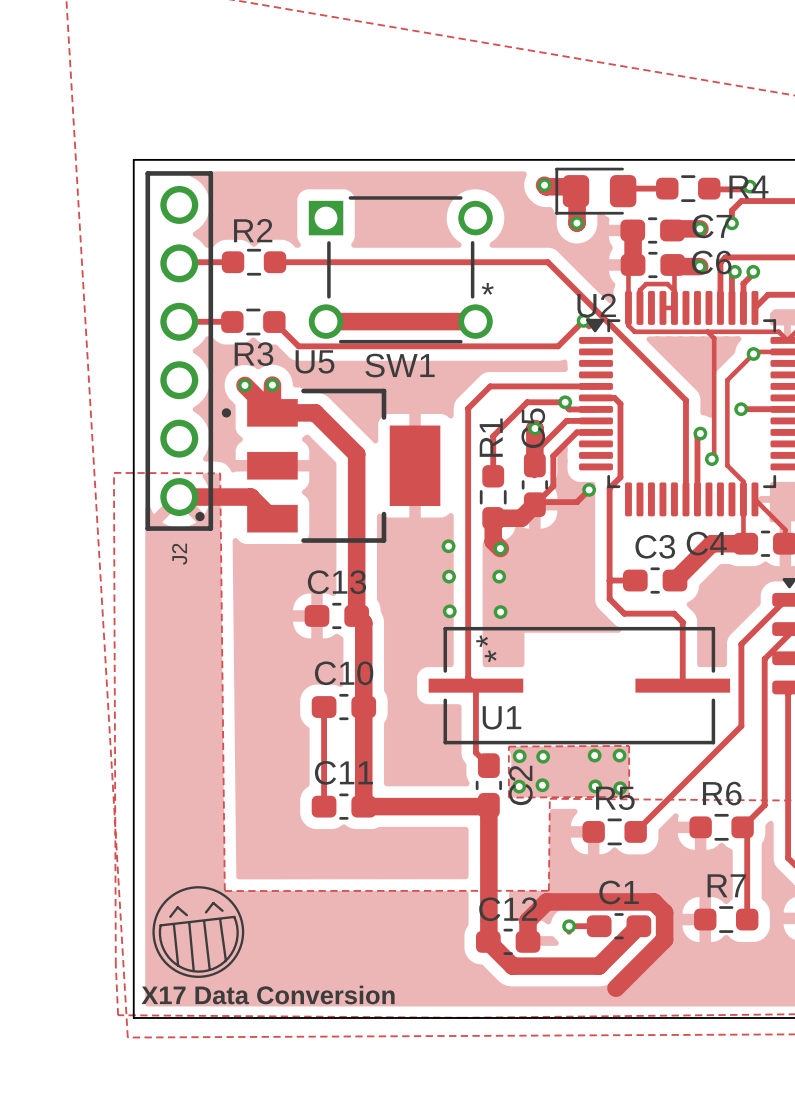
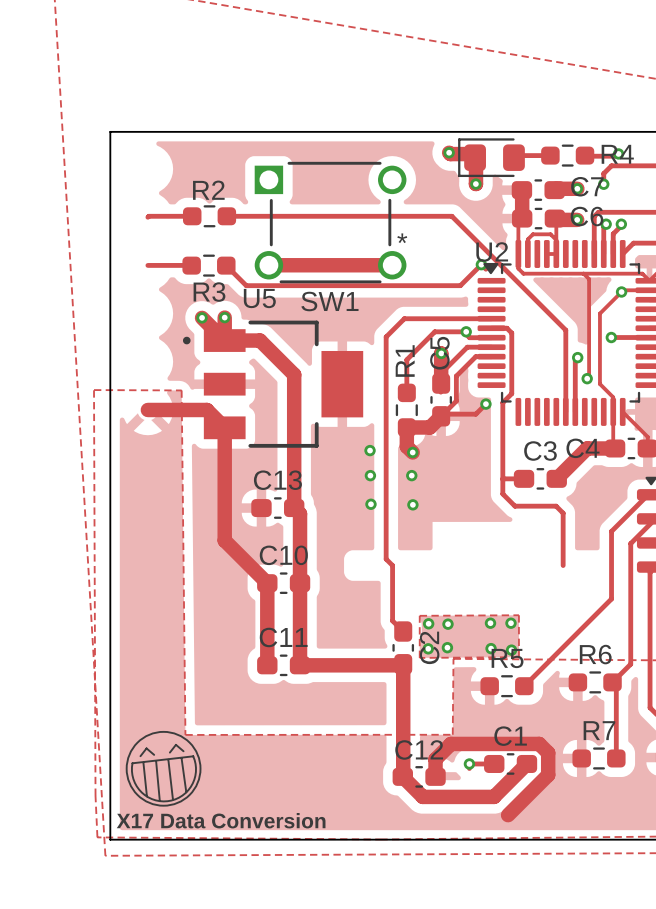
J2: (179, 351) -> none
track: none -> (224, 427) (224, 540) (267, 583)
U1: (579, 685) -> none
track width: thin (324, 707) (324, 806) -> thick (267, 583) (267, 665)

